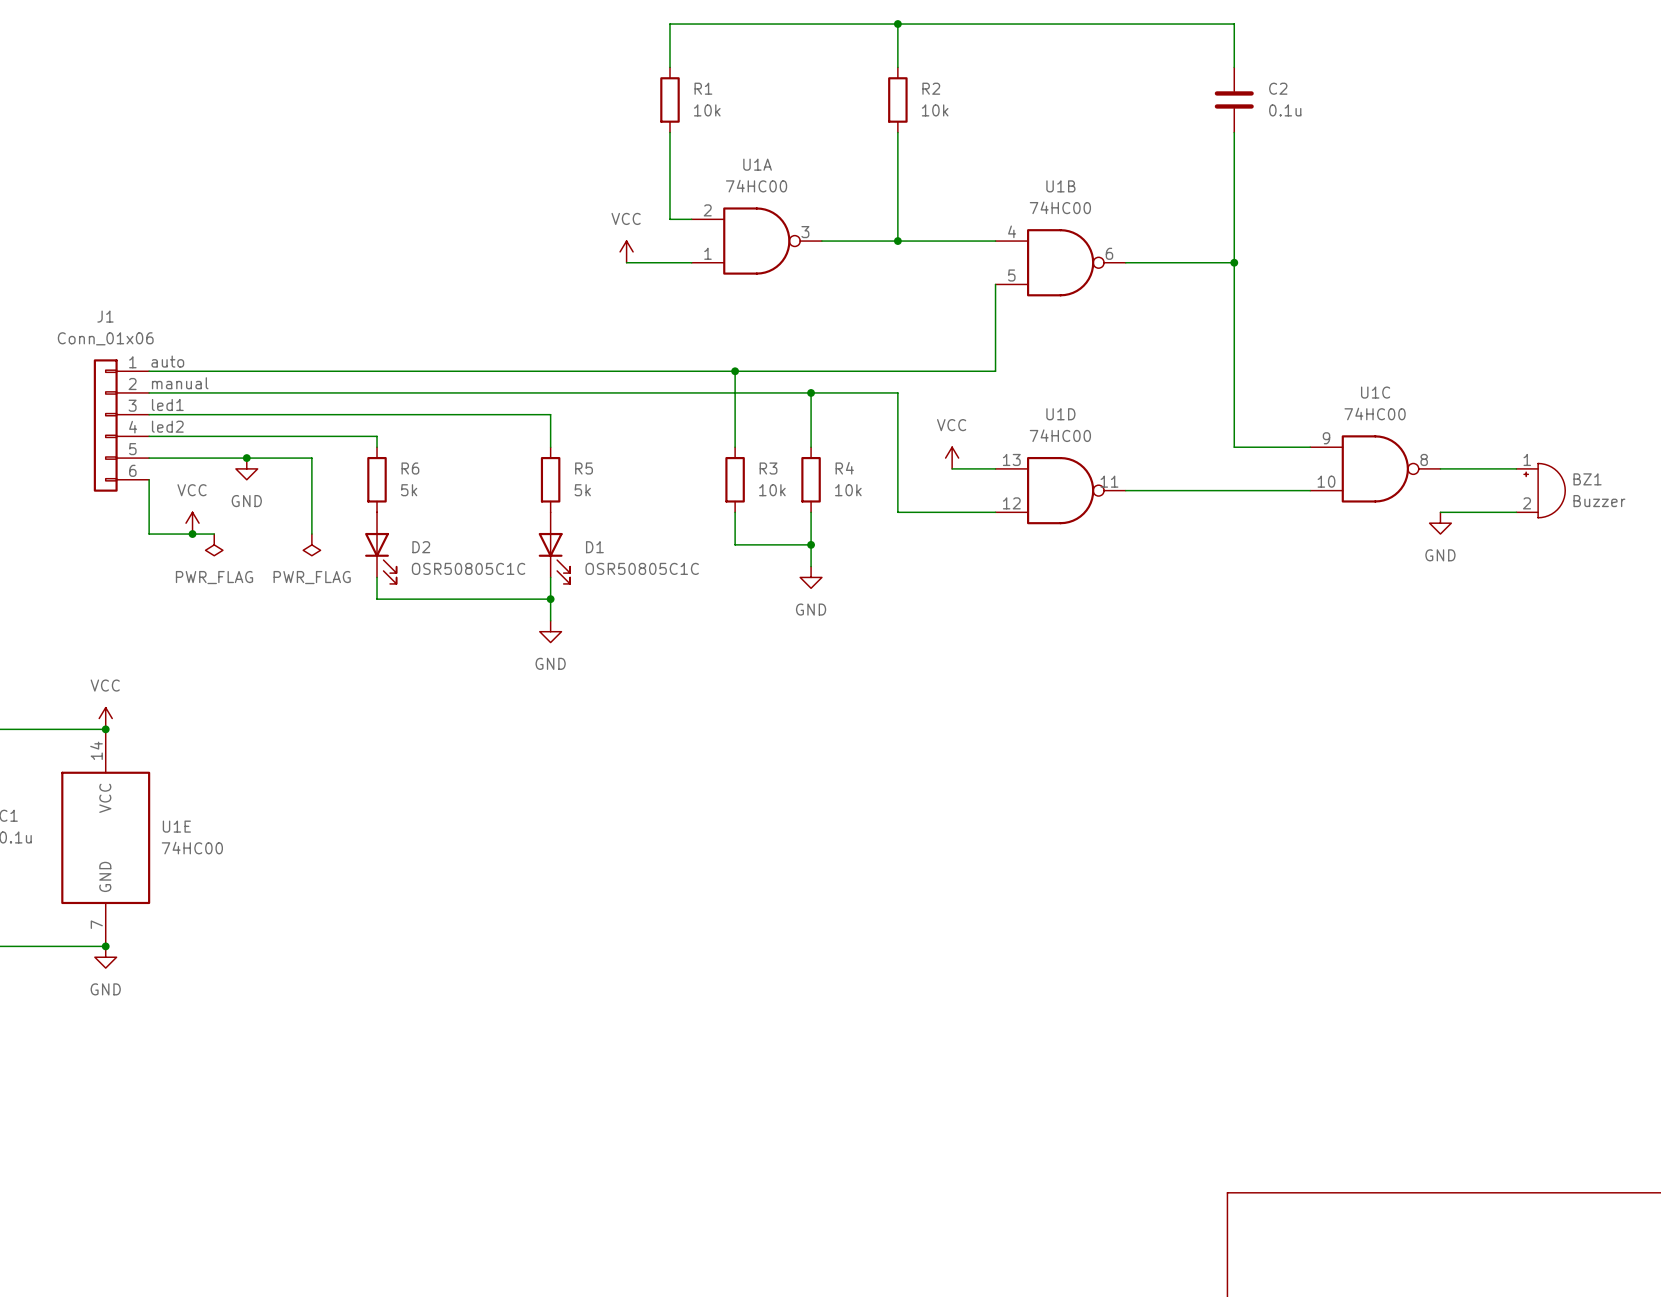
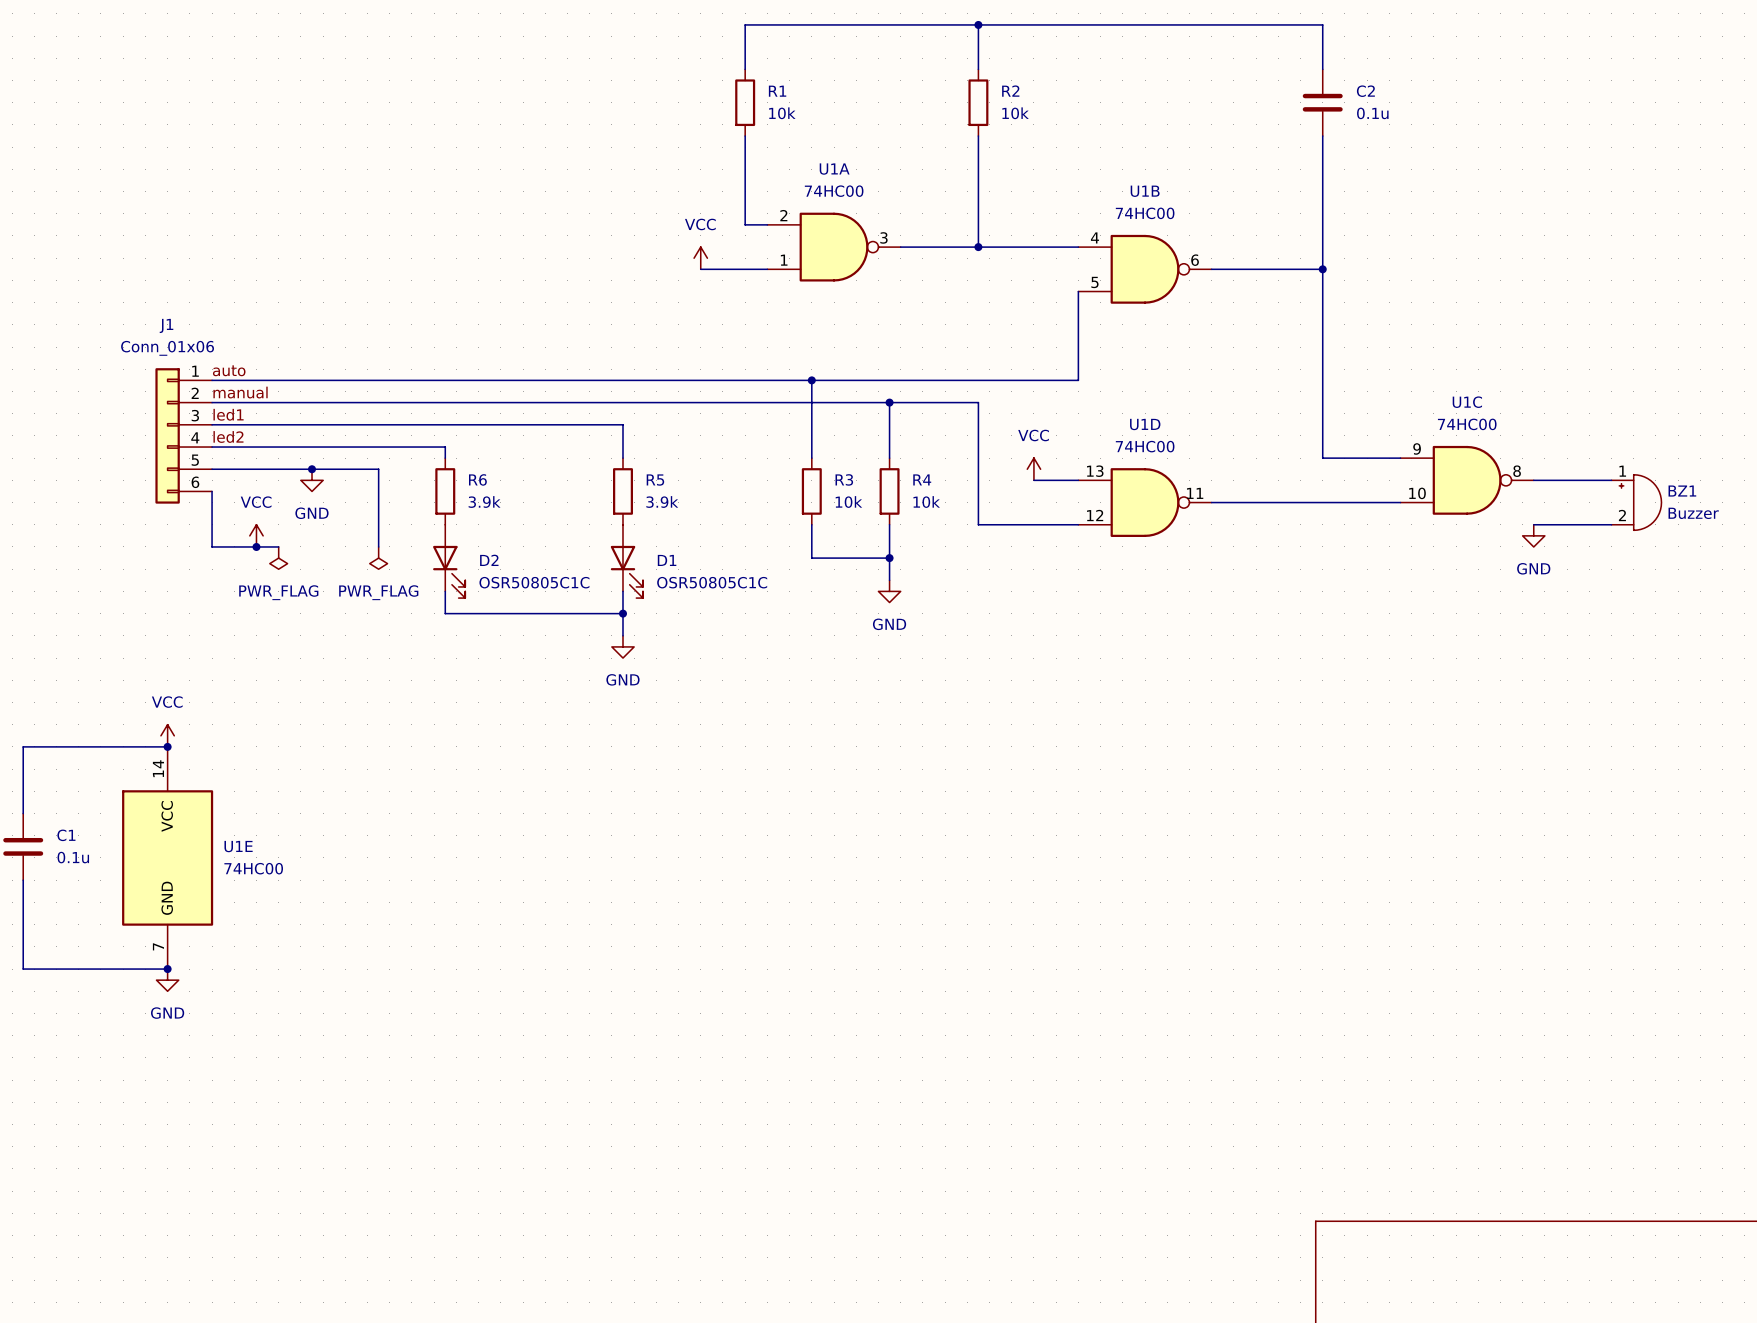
R6 value: 5k (409, 490) -> 3.9k (484, 502)
R5 value: 5k (582, 490) -> 3.9k (662, 502)

